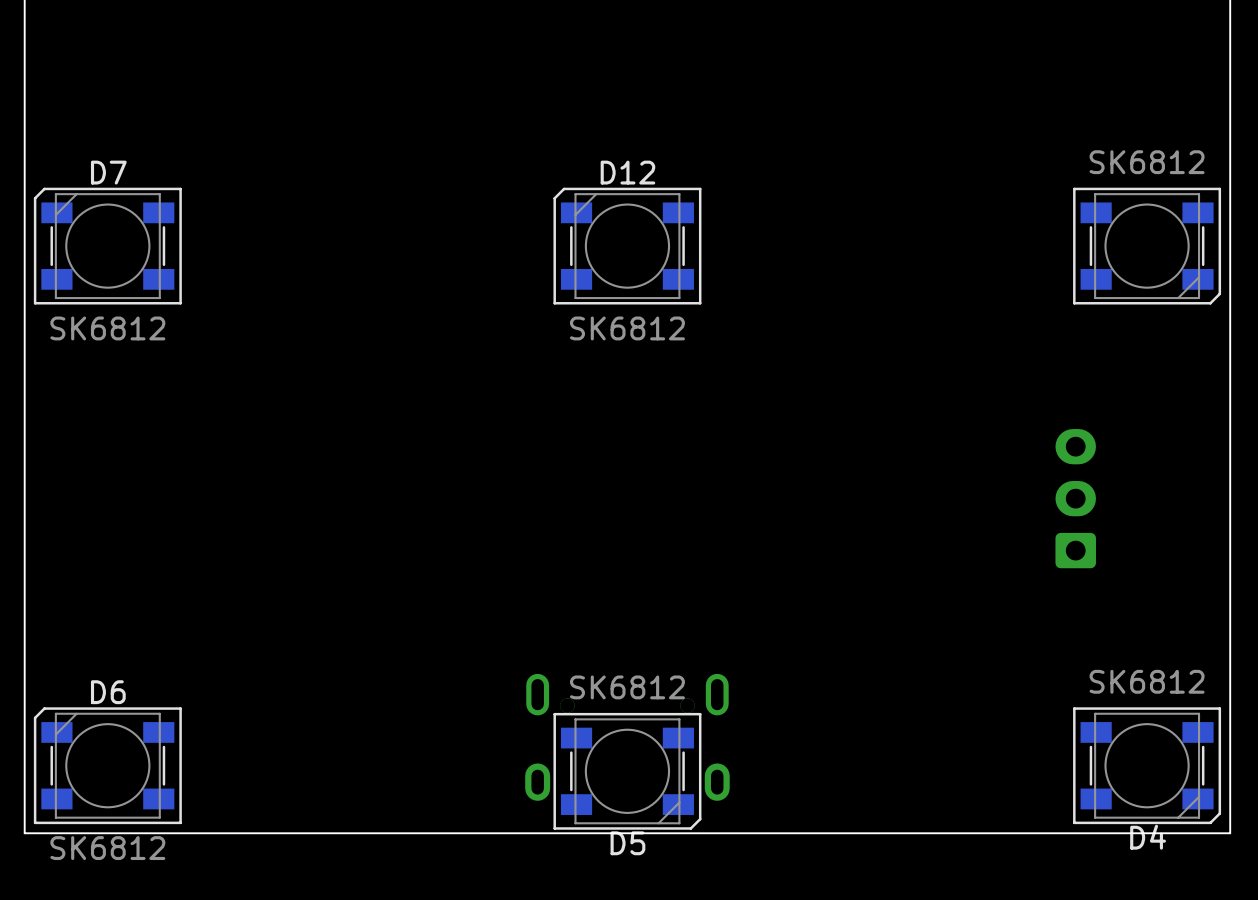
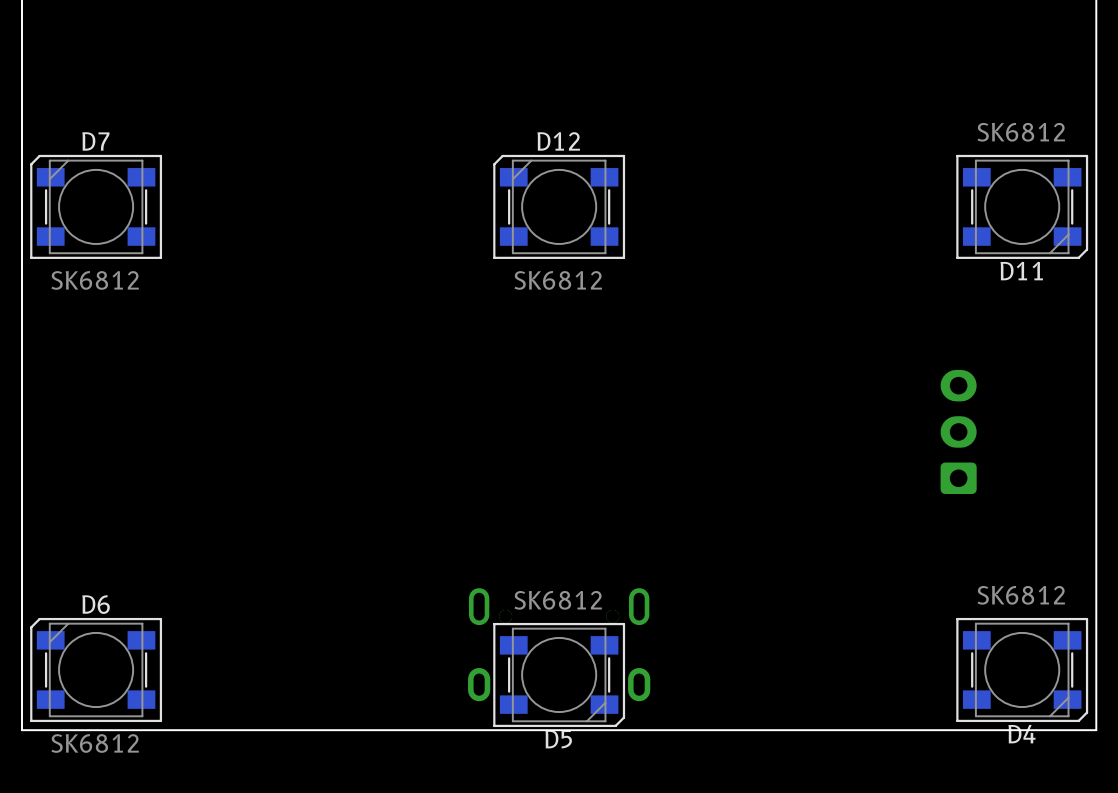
D11 name: none -> D11 (1021, 271)

